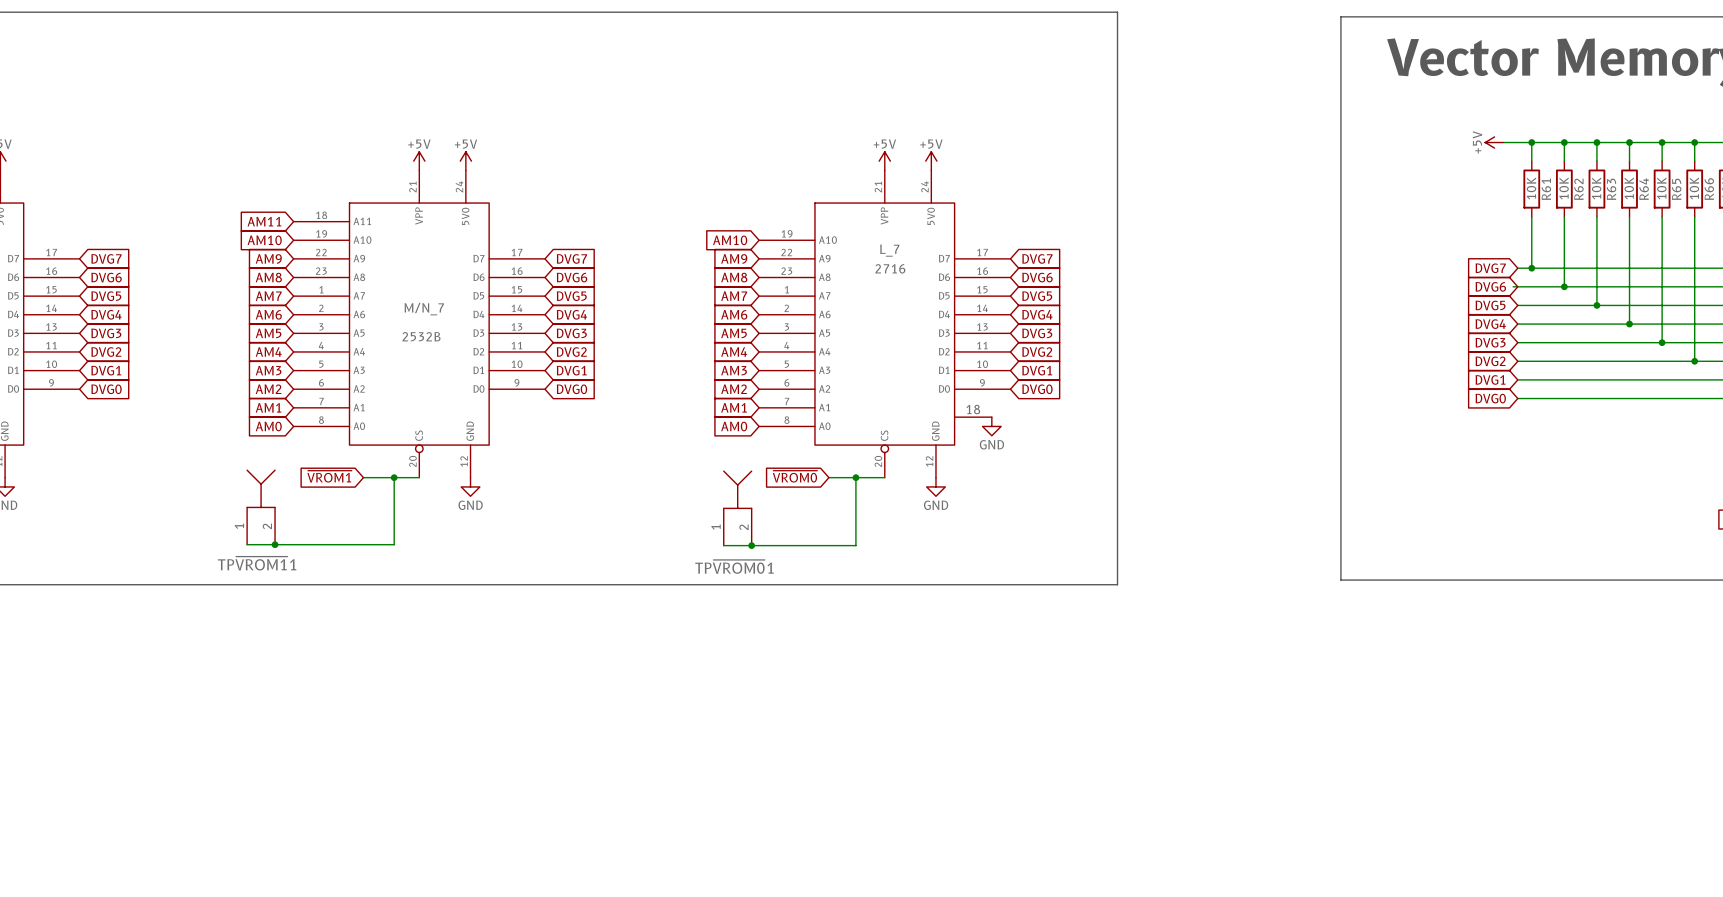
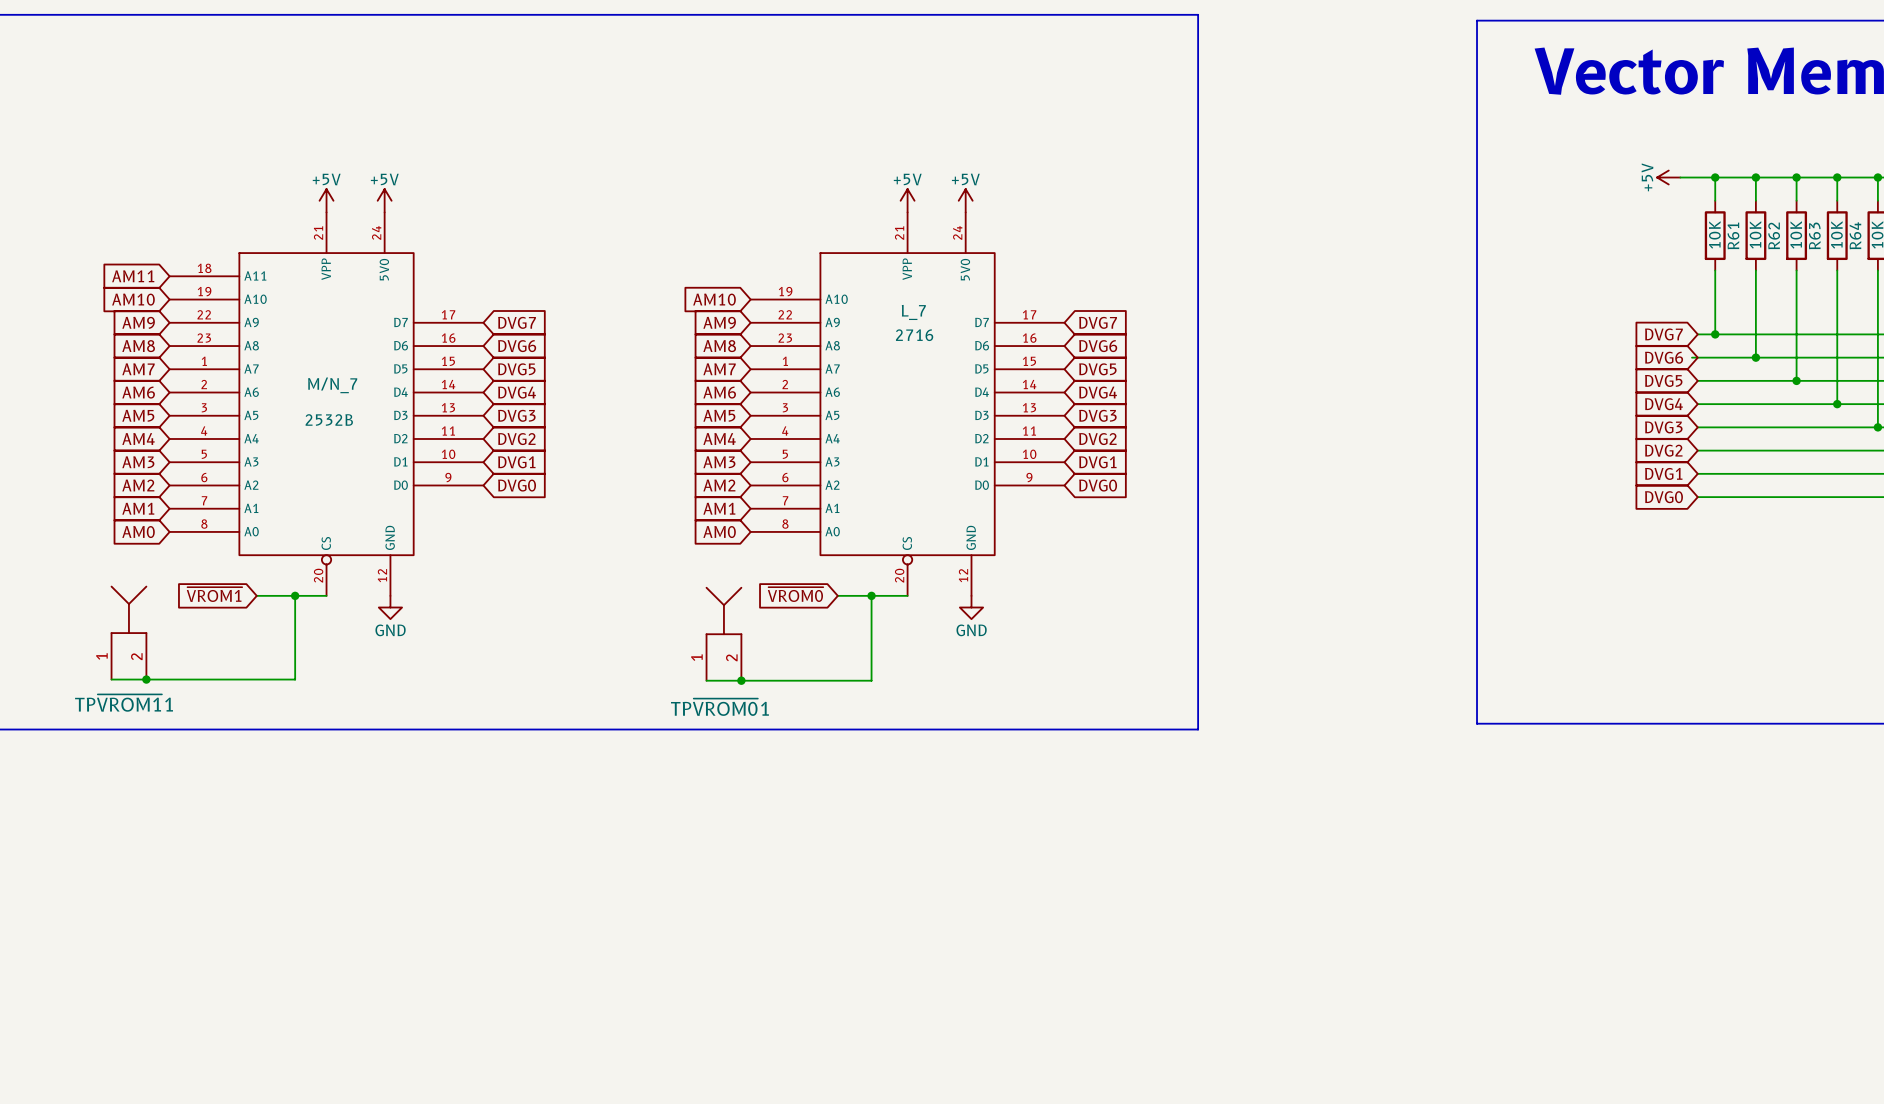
L_7 symbol: [759, 170, 1011, 478] -> [750, 212, 1065, 596]
power symbol: GND (991, 426) -> none

